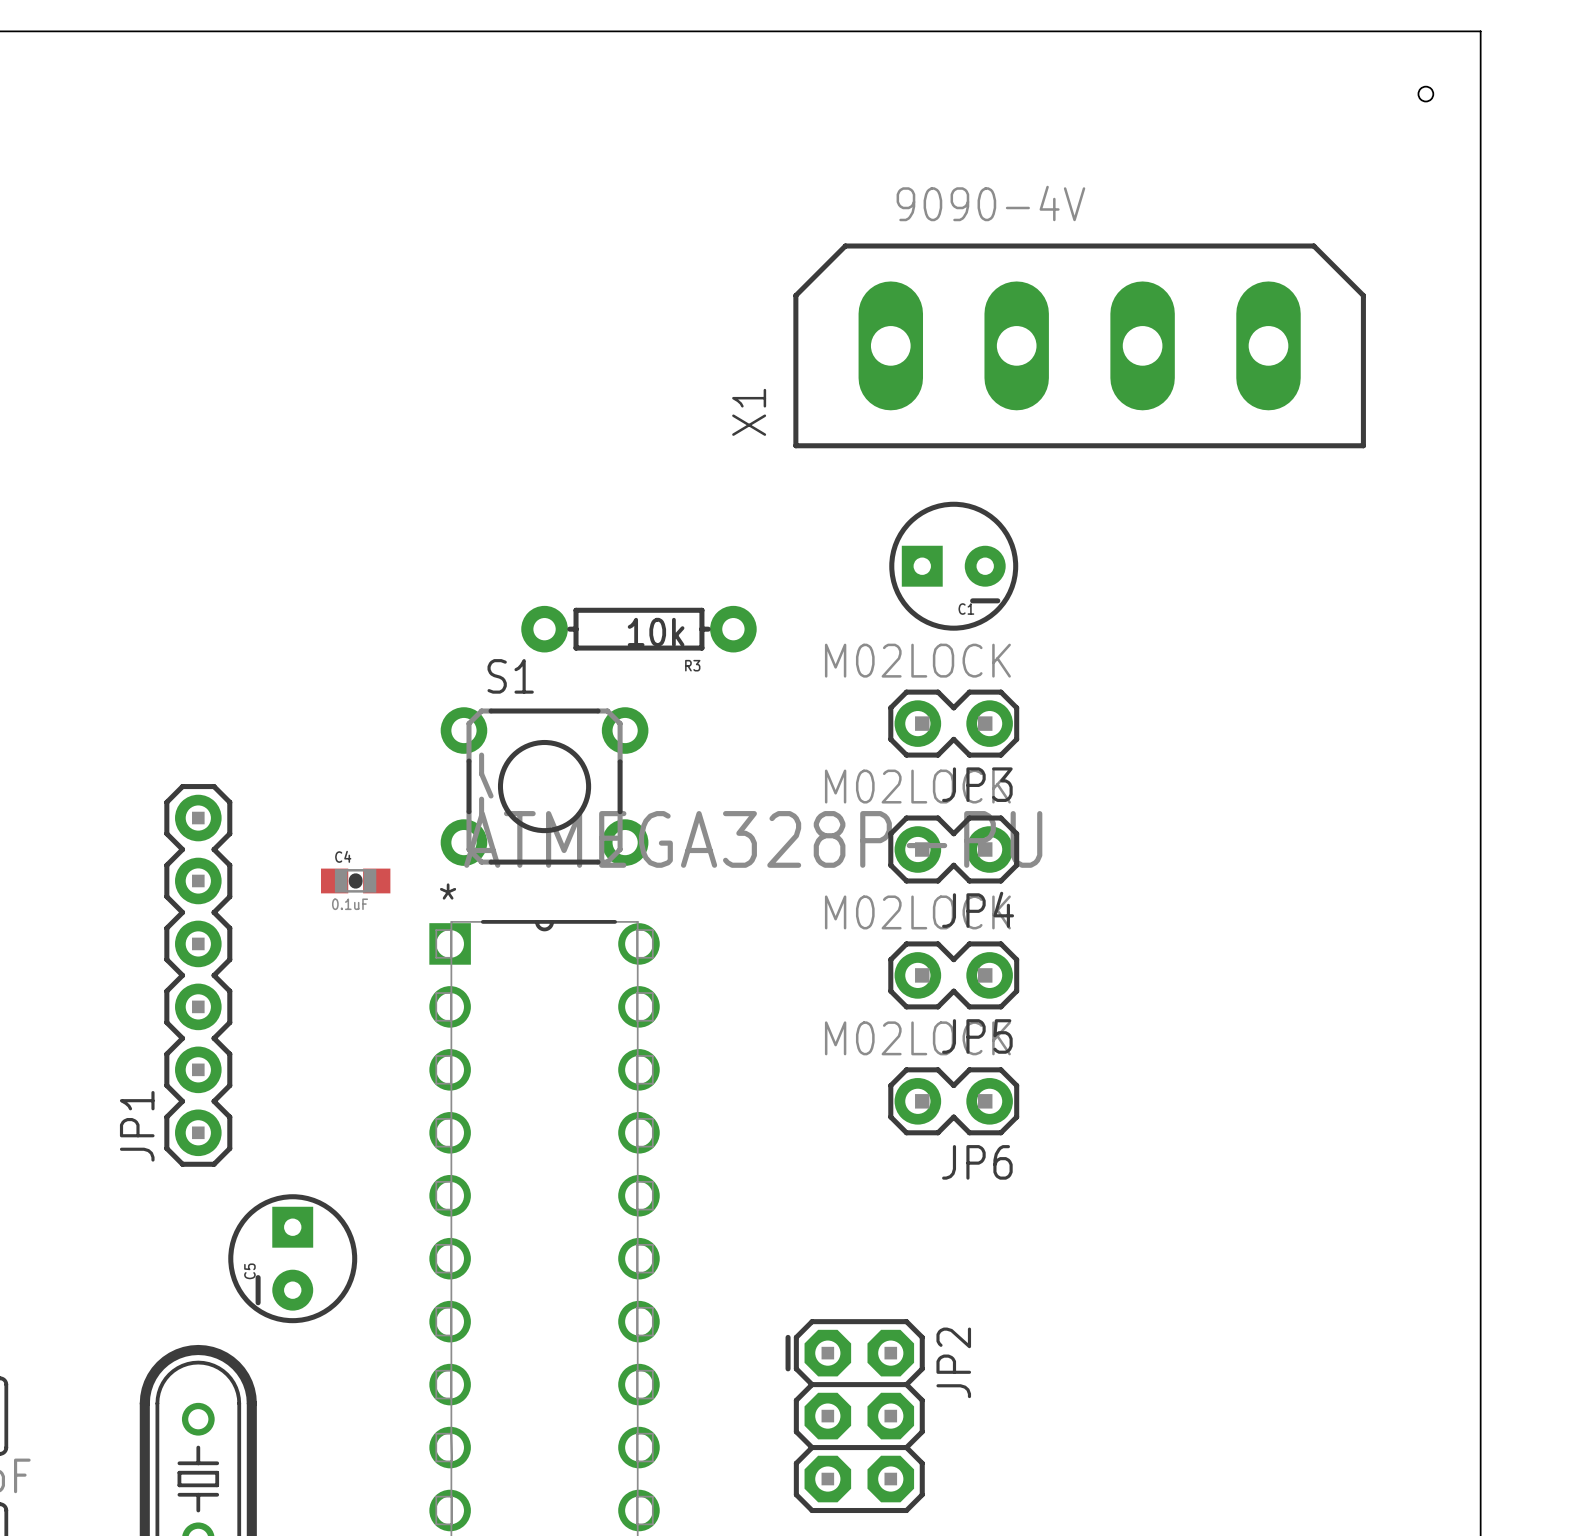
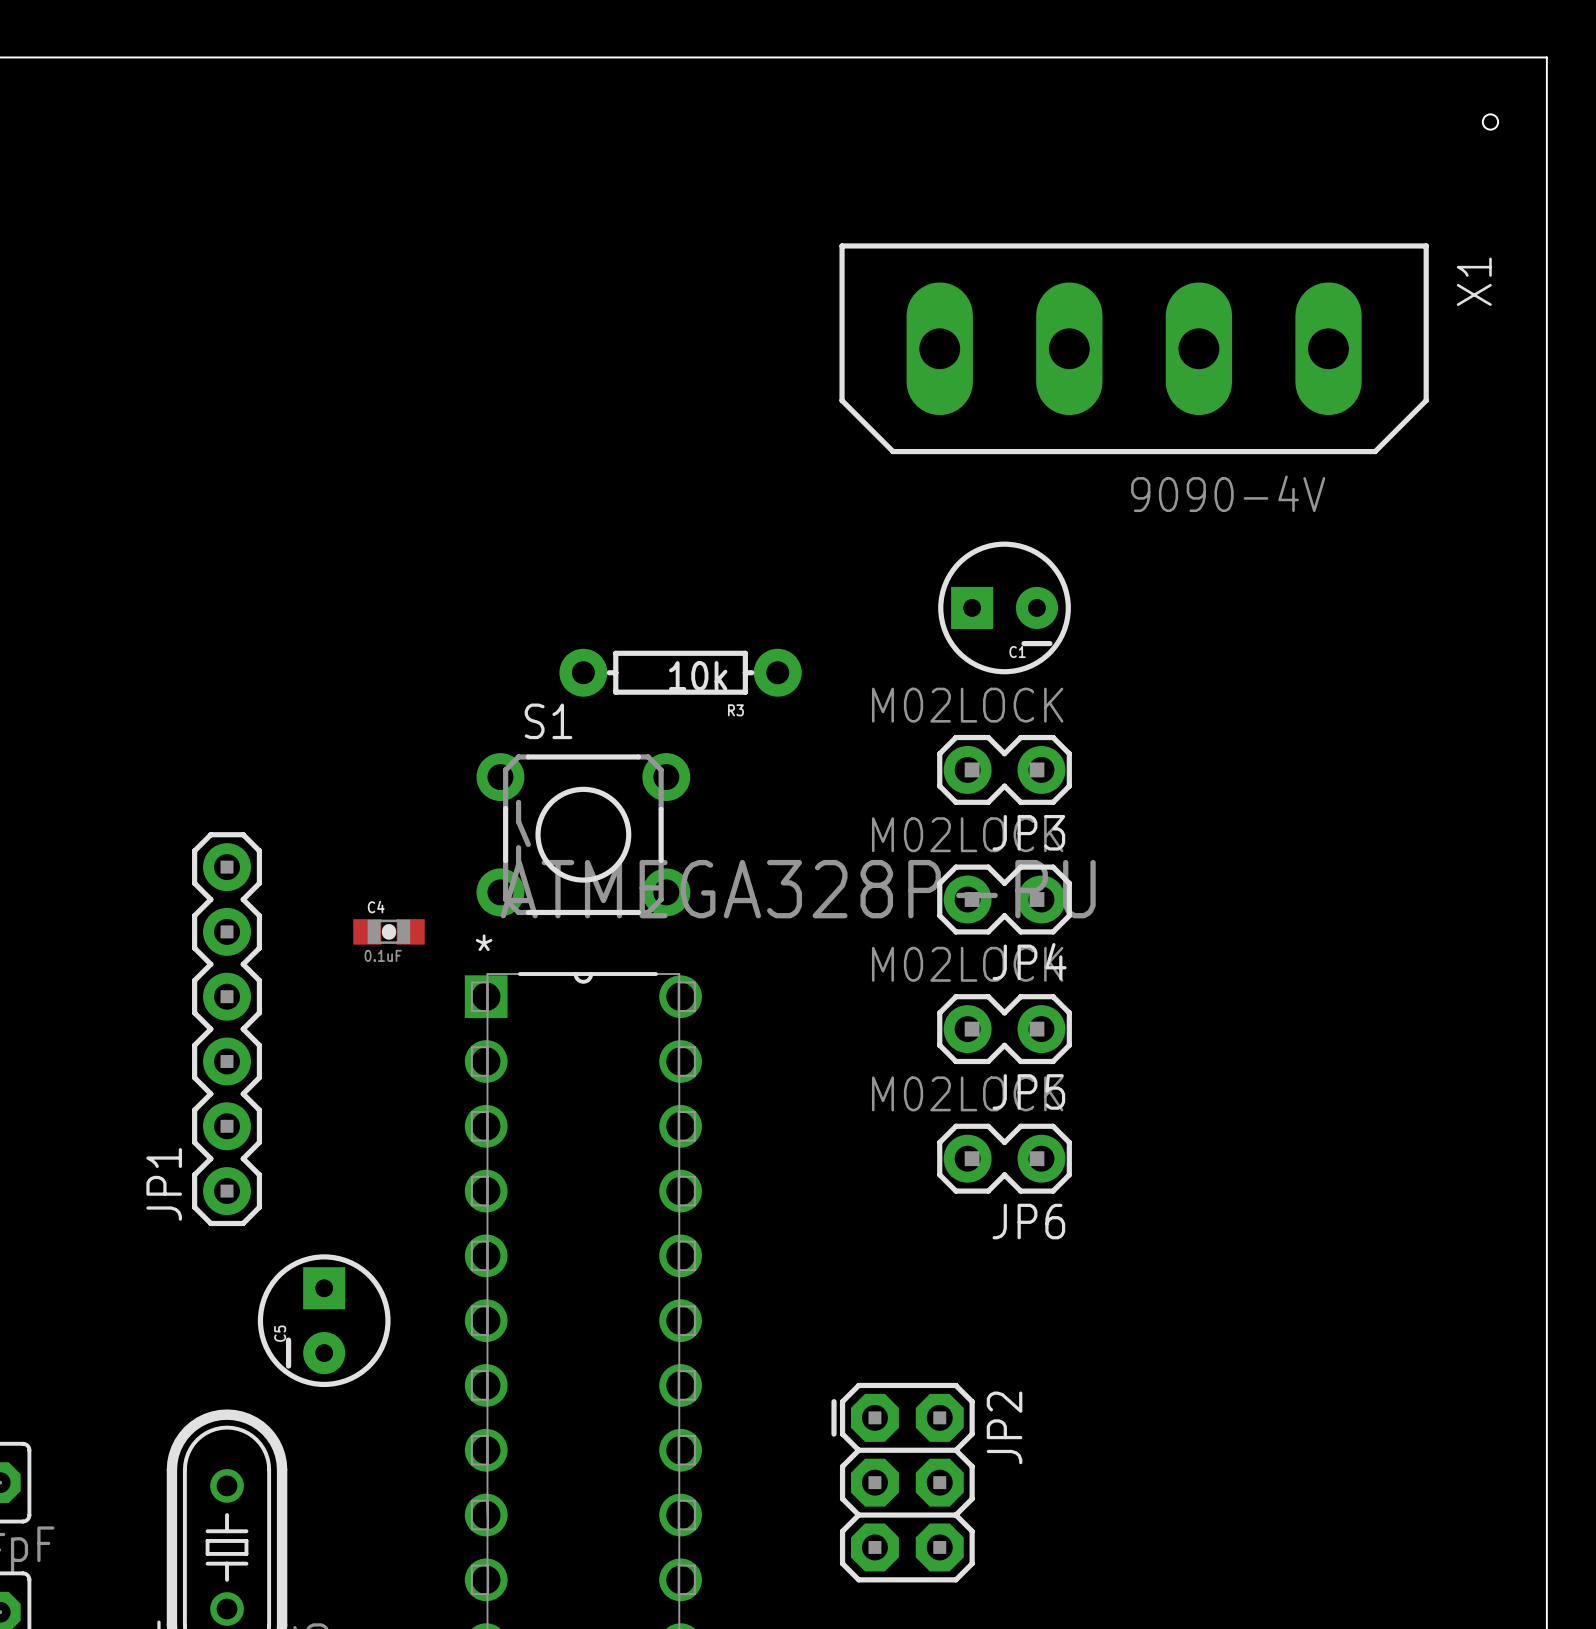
X1 rotation: 0° (1079, 345) -> 180° (1134, 348)

